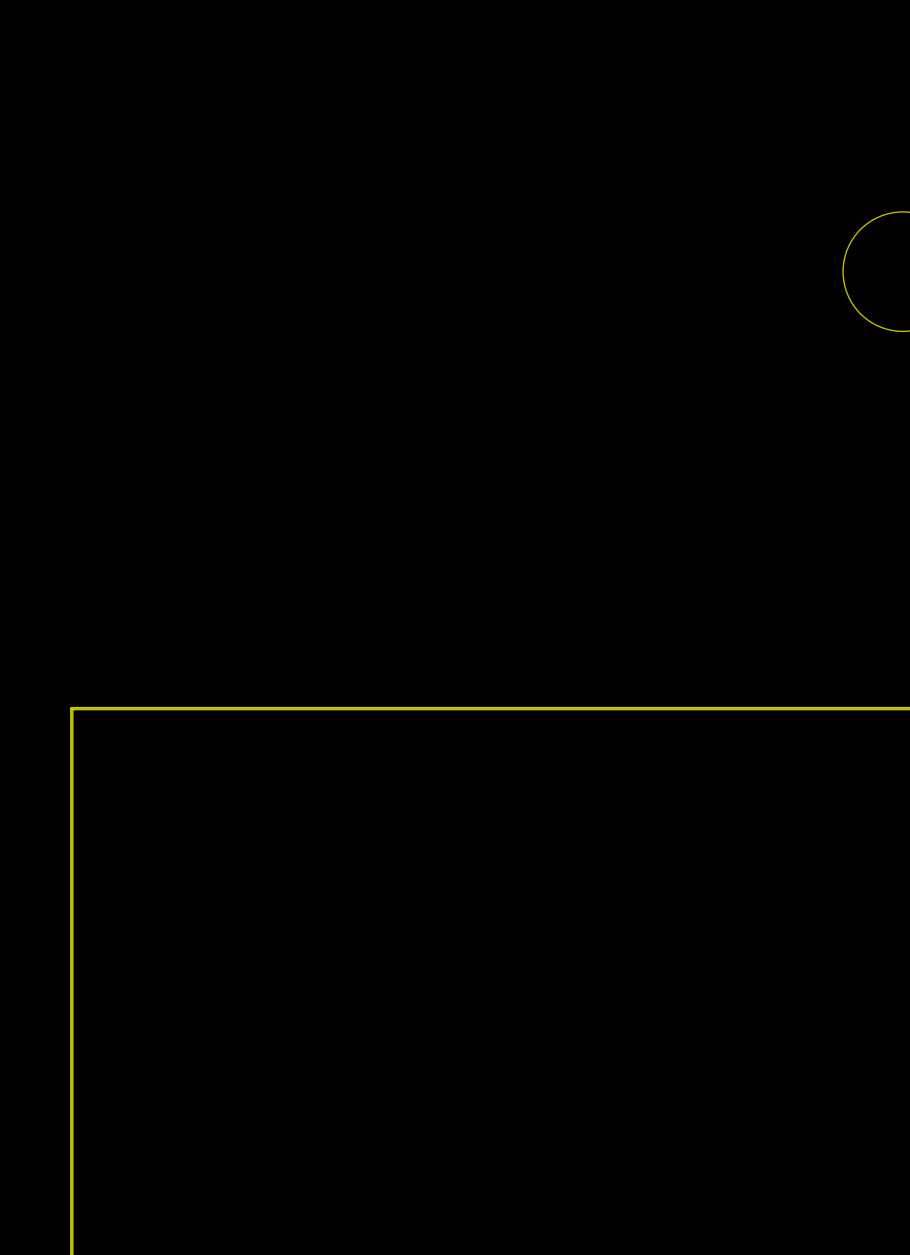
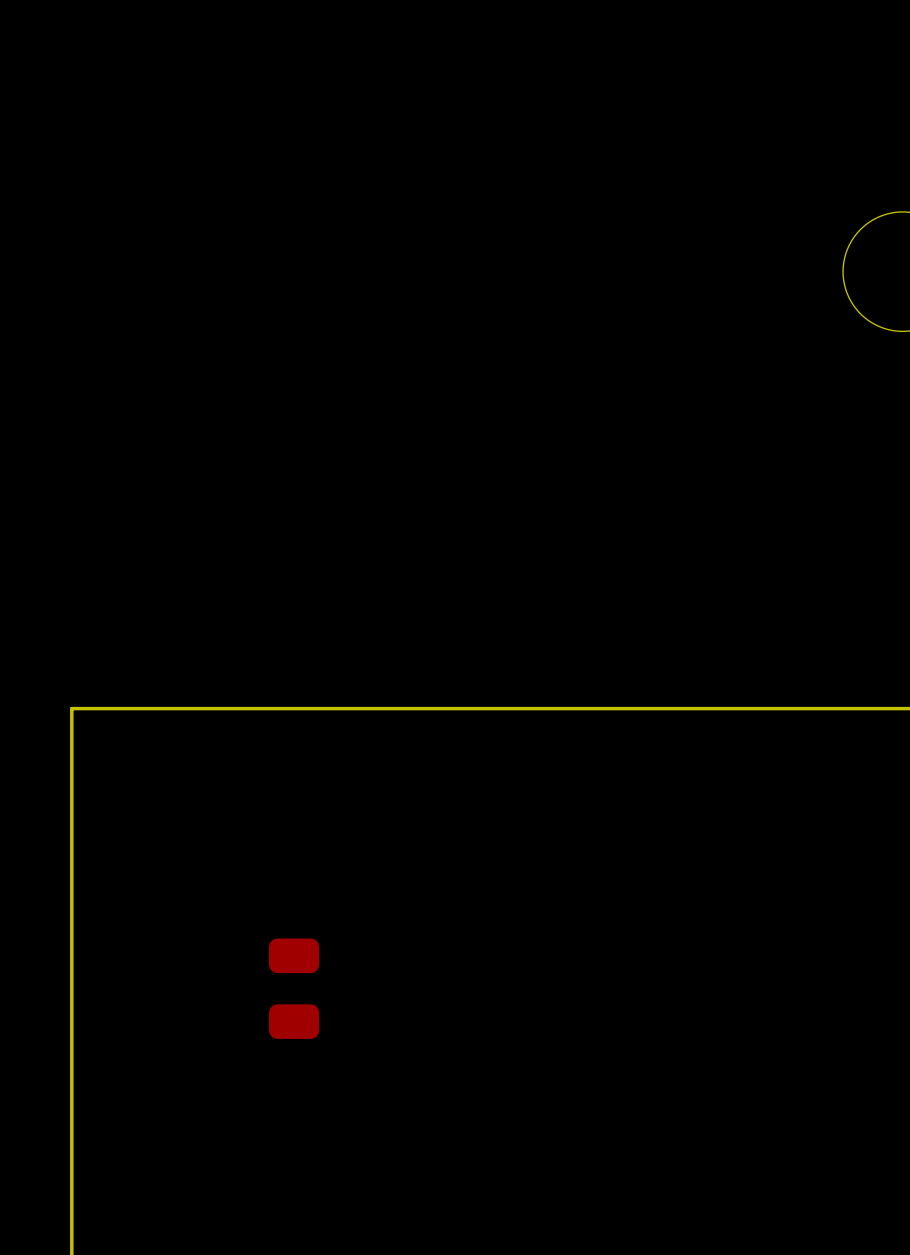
part: none -> (294, 988)

